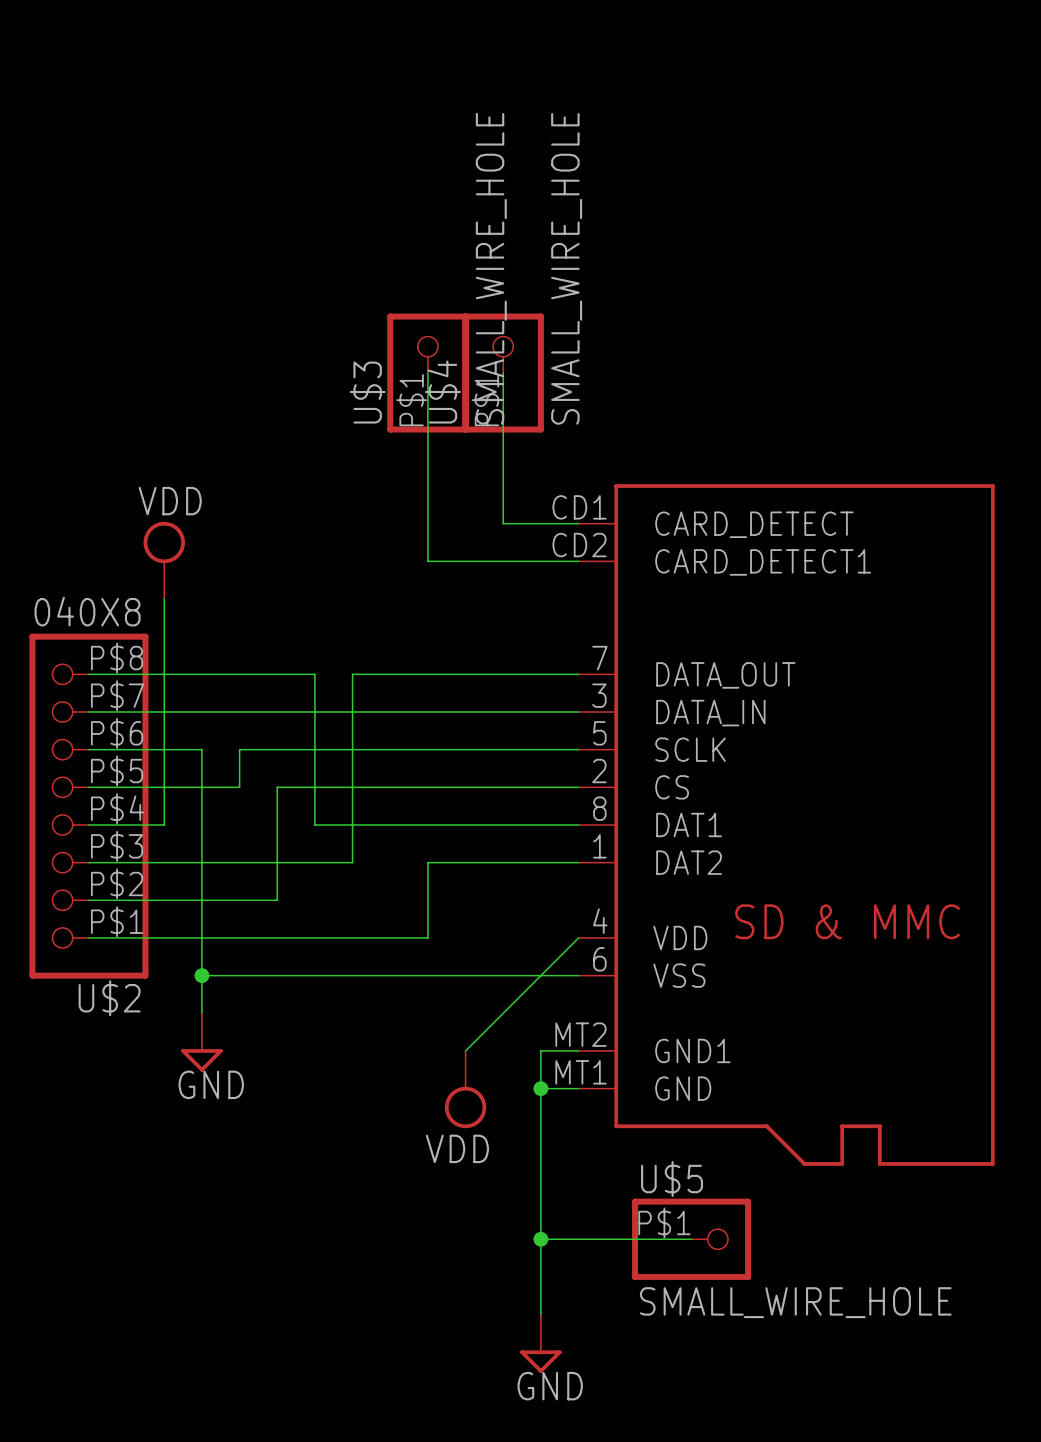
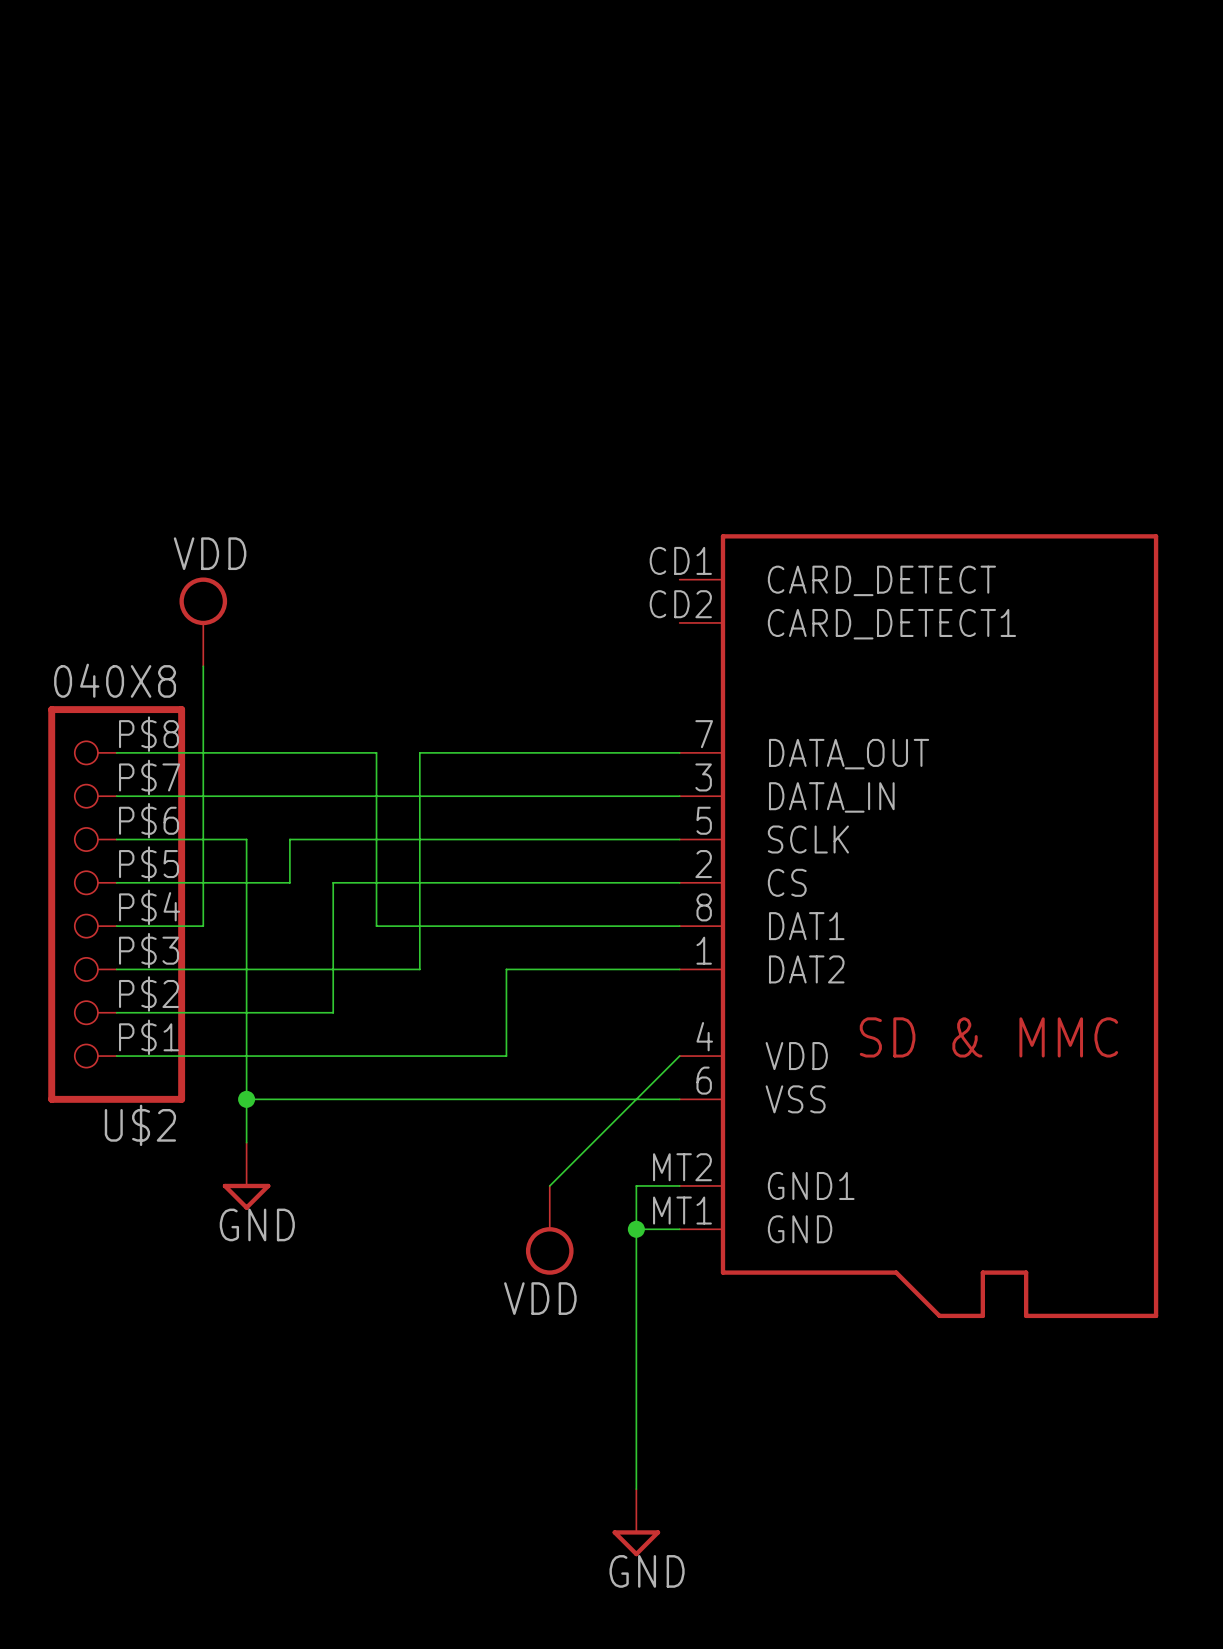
wire: (427, 373) (427, 561) (578, 561) -> none
U$3: SMALL_WIRE_HOLE (427, 373) -> none
wire: (503, 373) (503, 523) (578, 523) -> none
U$4: SMALL_WIRE_HOLE (503, 373) -> none
wire: (540, 1239) (691, 1239) -> none
junction: (540, 1239) -> none
U$5: SMALL_WIRE_HOLE (691, 1239) -> none

